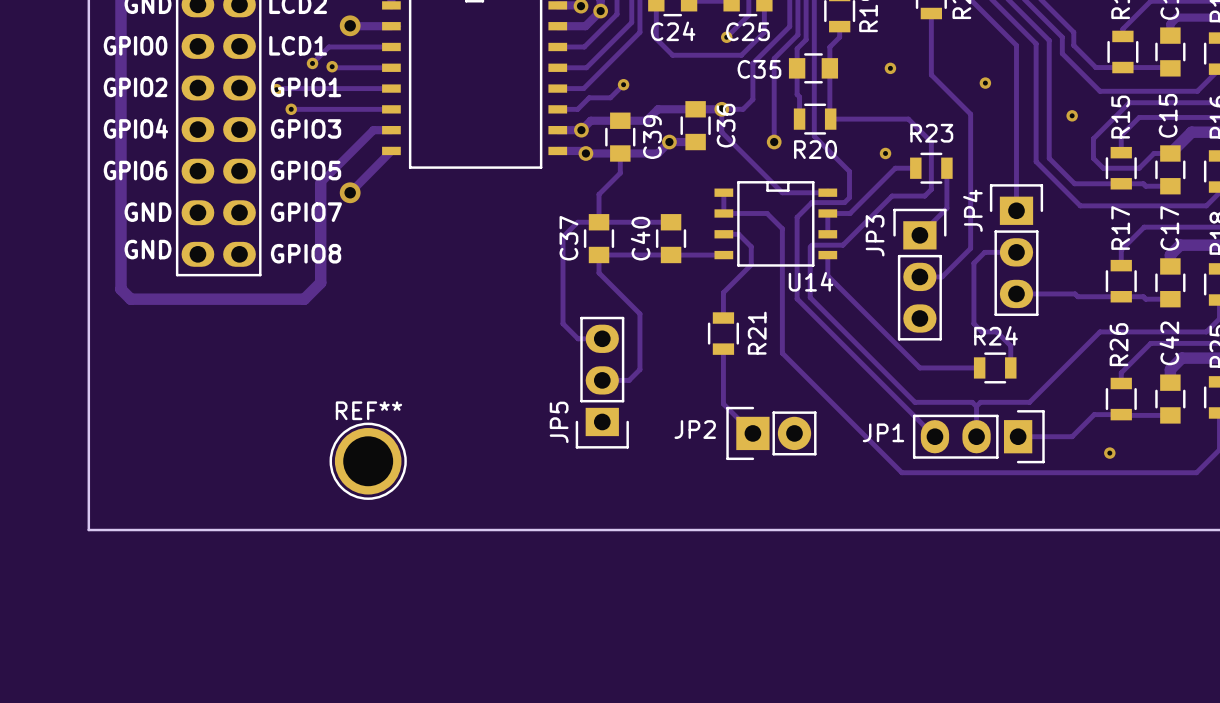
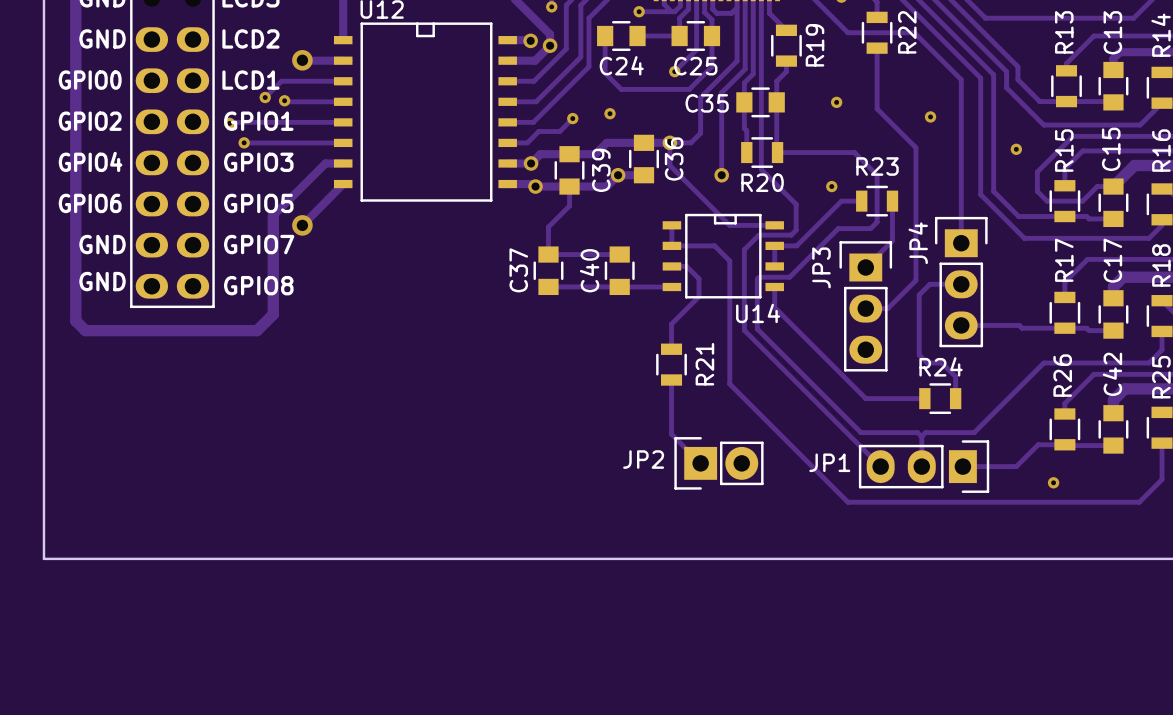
via: none -> (610, 113)
track: (599, 222) (577, 222) (563, 236) (563, 323) (578, 338) (602, 338) -> none
track: (599, 254) (599, 272) (639, 313) (639, 369) (629, 380) (602, 380) -> none
JP5: (602, 382) -> none
REF**: (368, 461) -> none

